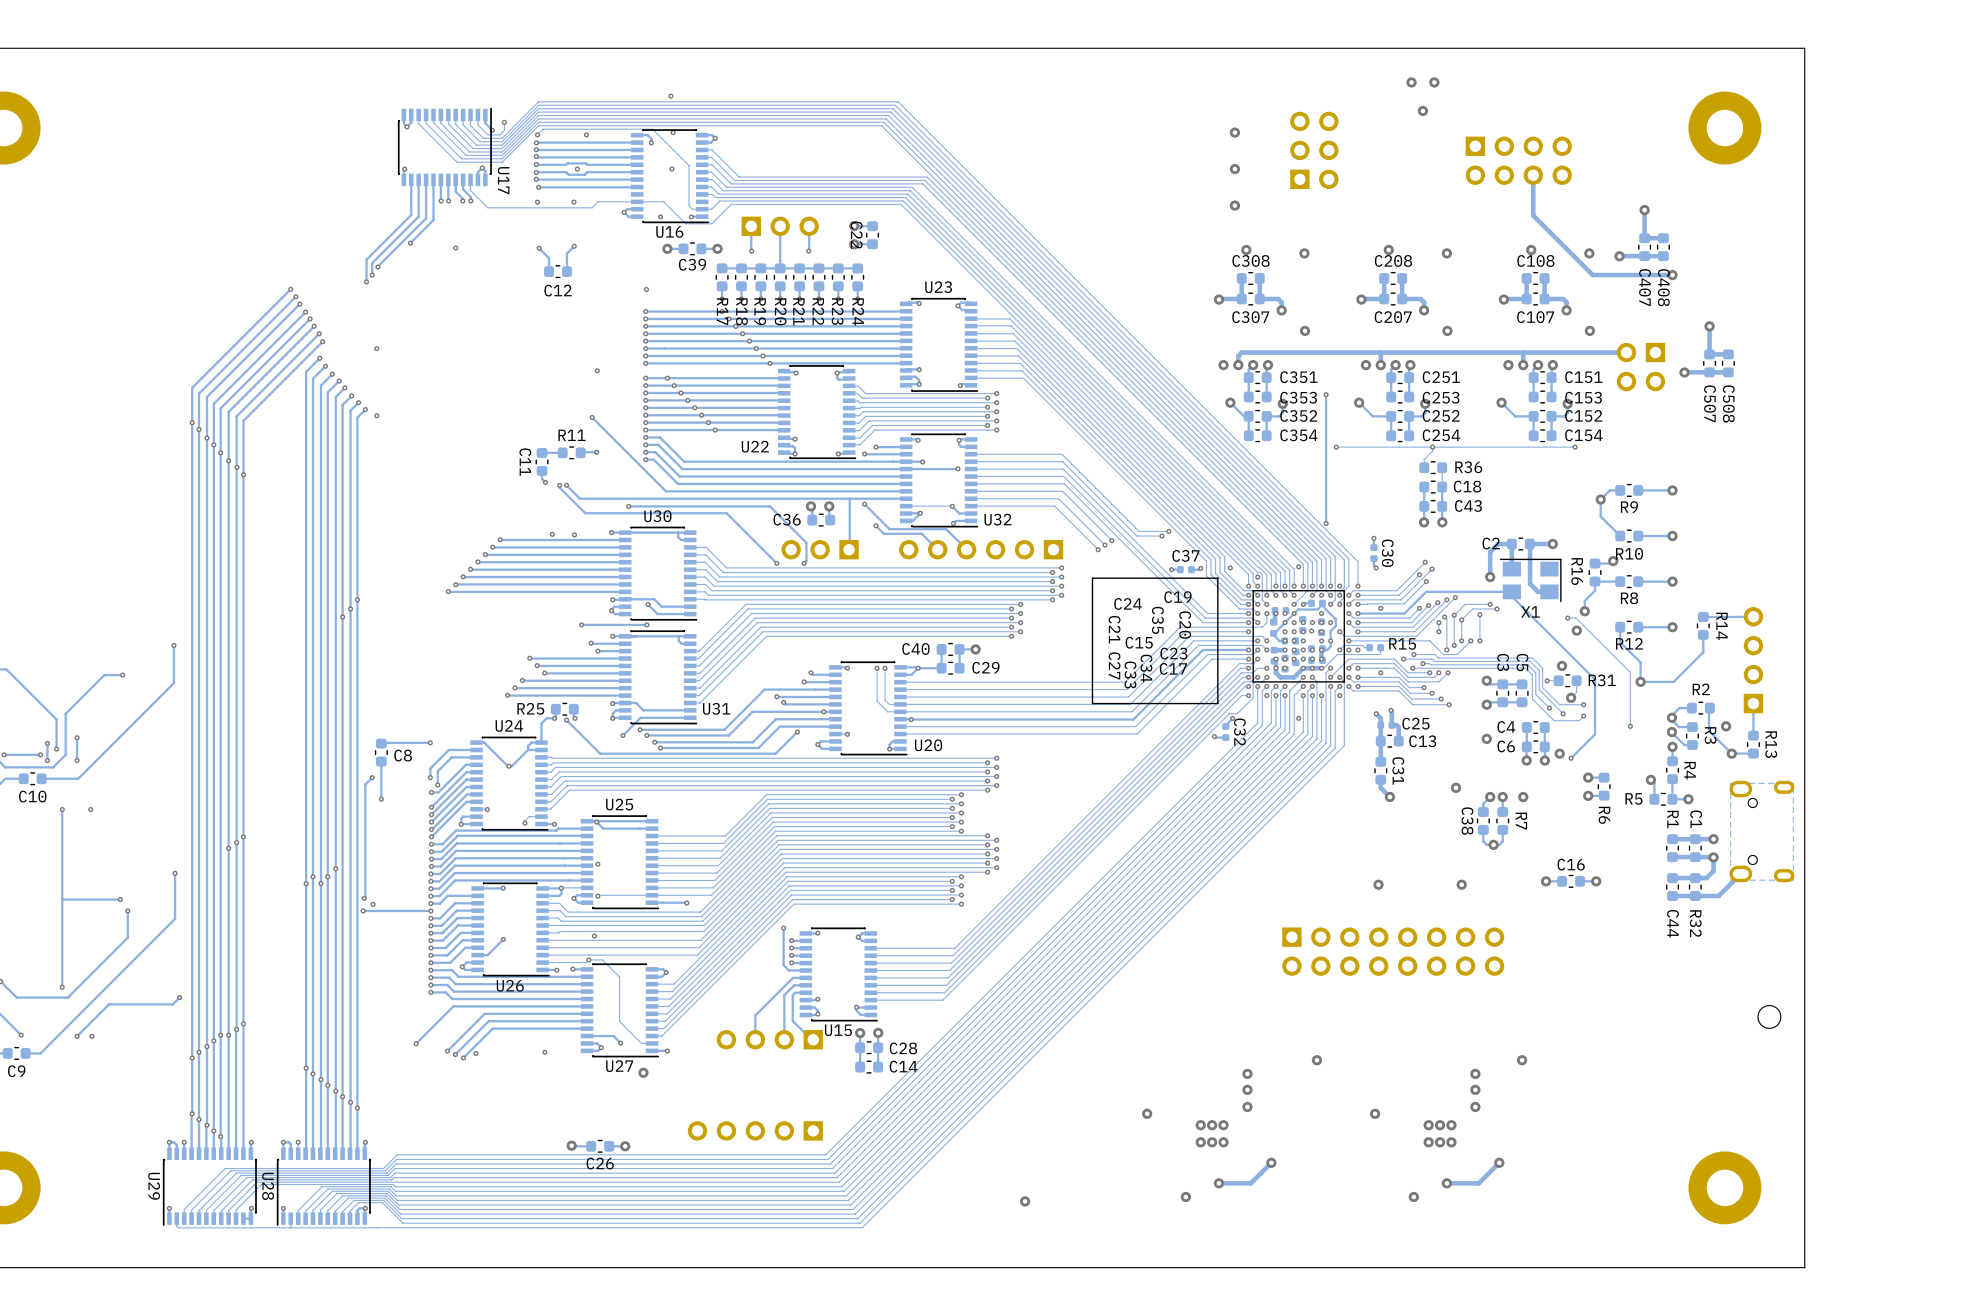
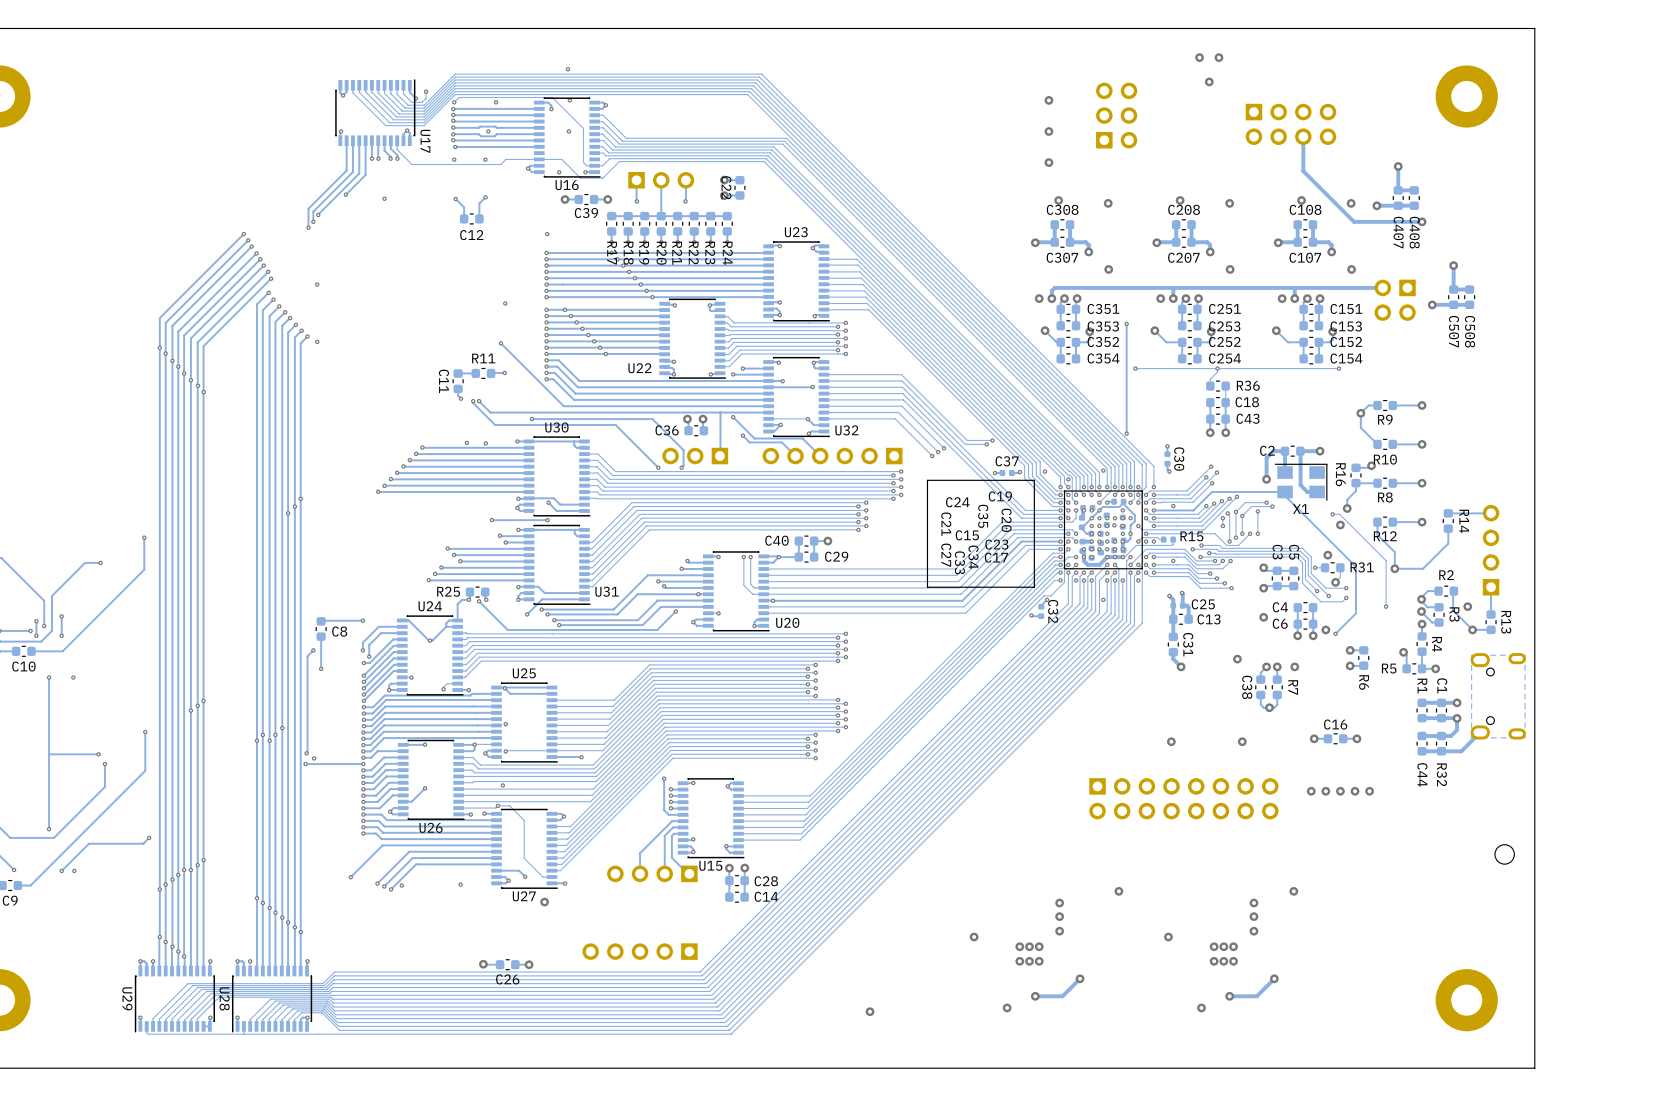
via: none -> (1311, 791)
via: none -> (1325, 791)
via: none -> (1340, 791)
via: none -> (1355, 791)
via: none -> (1369, 791)

